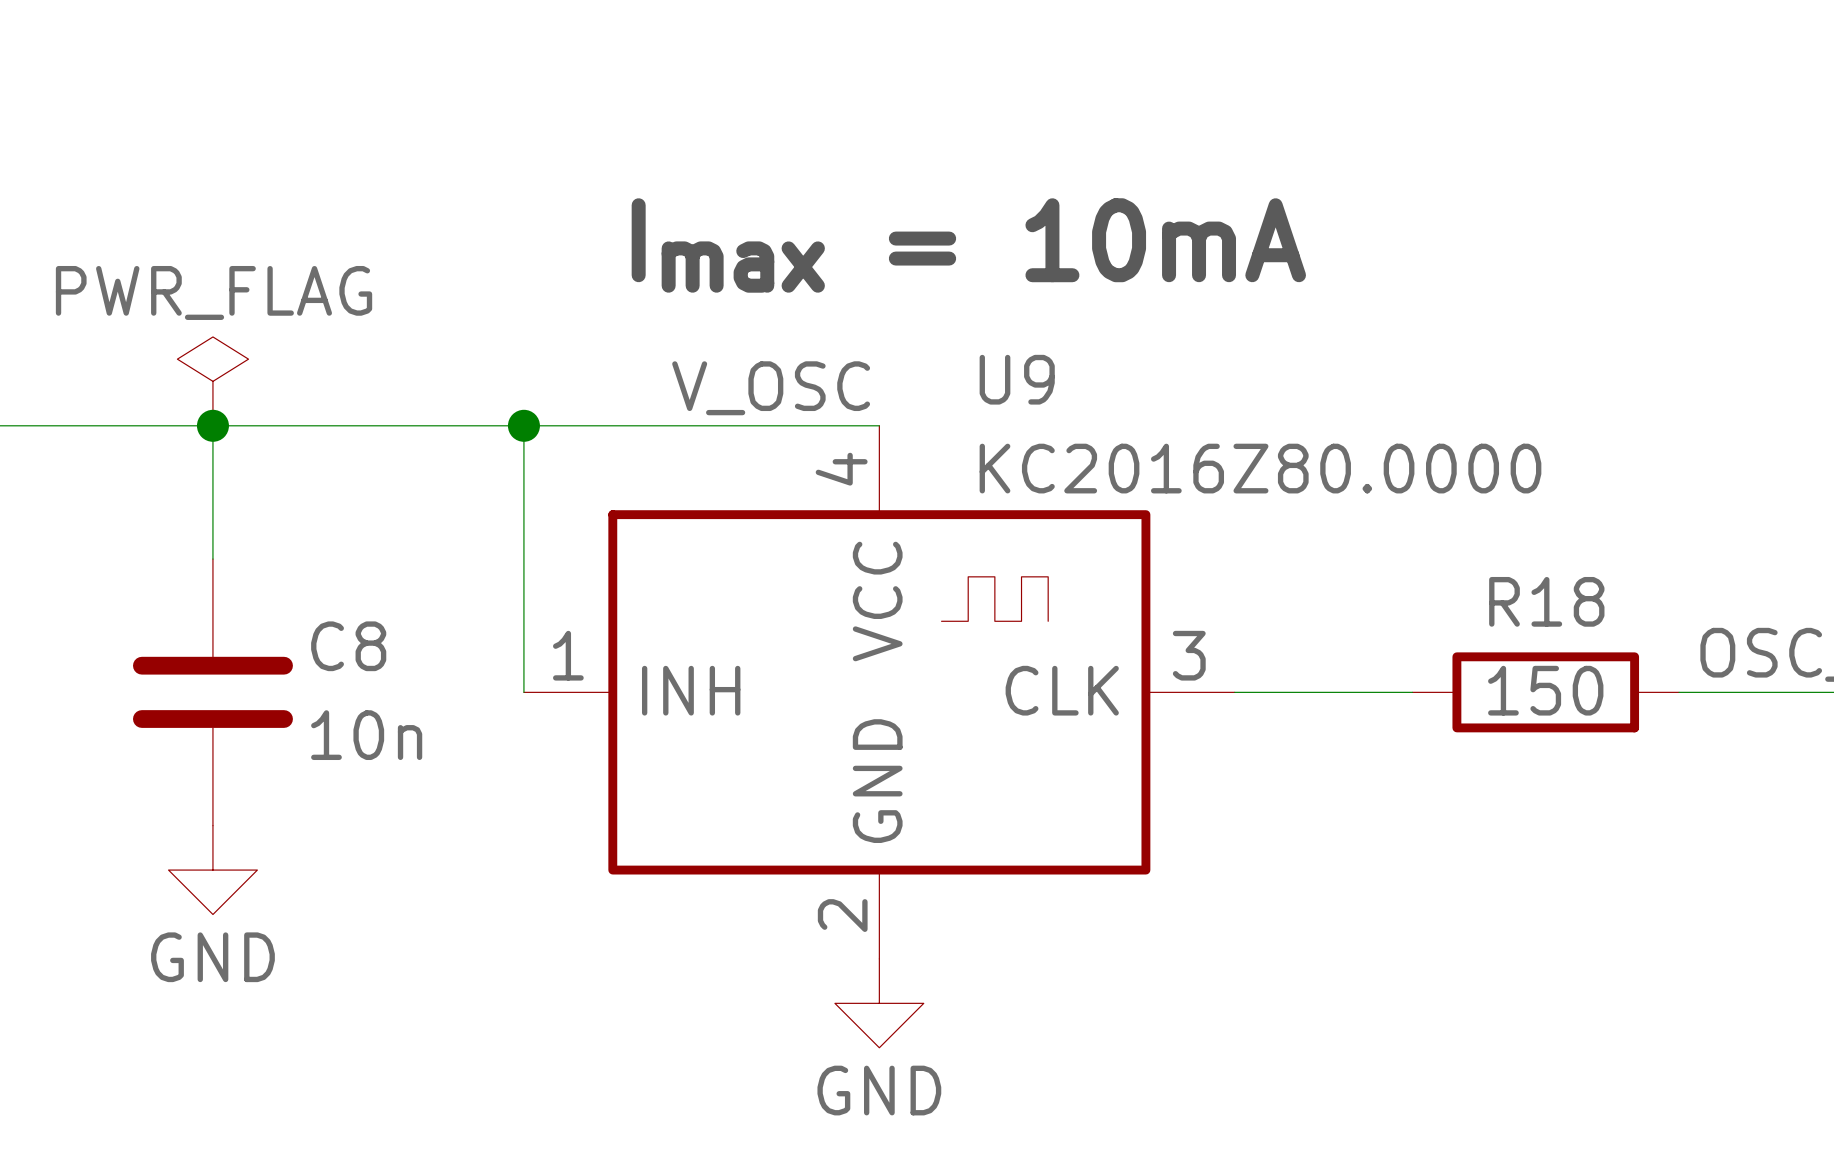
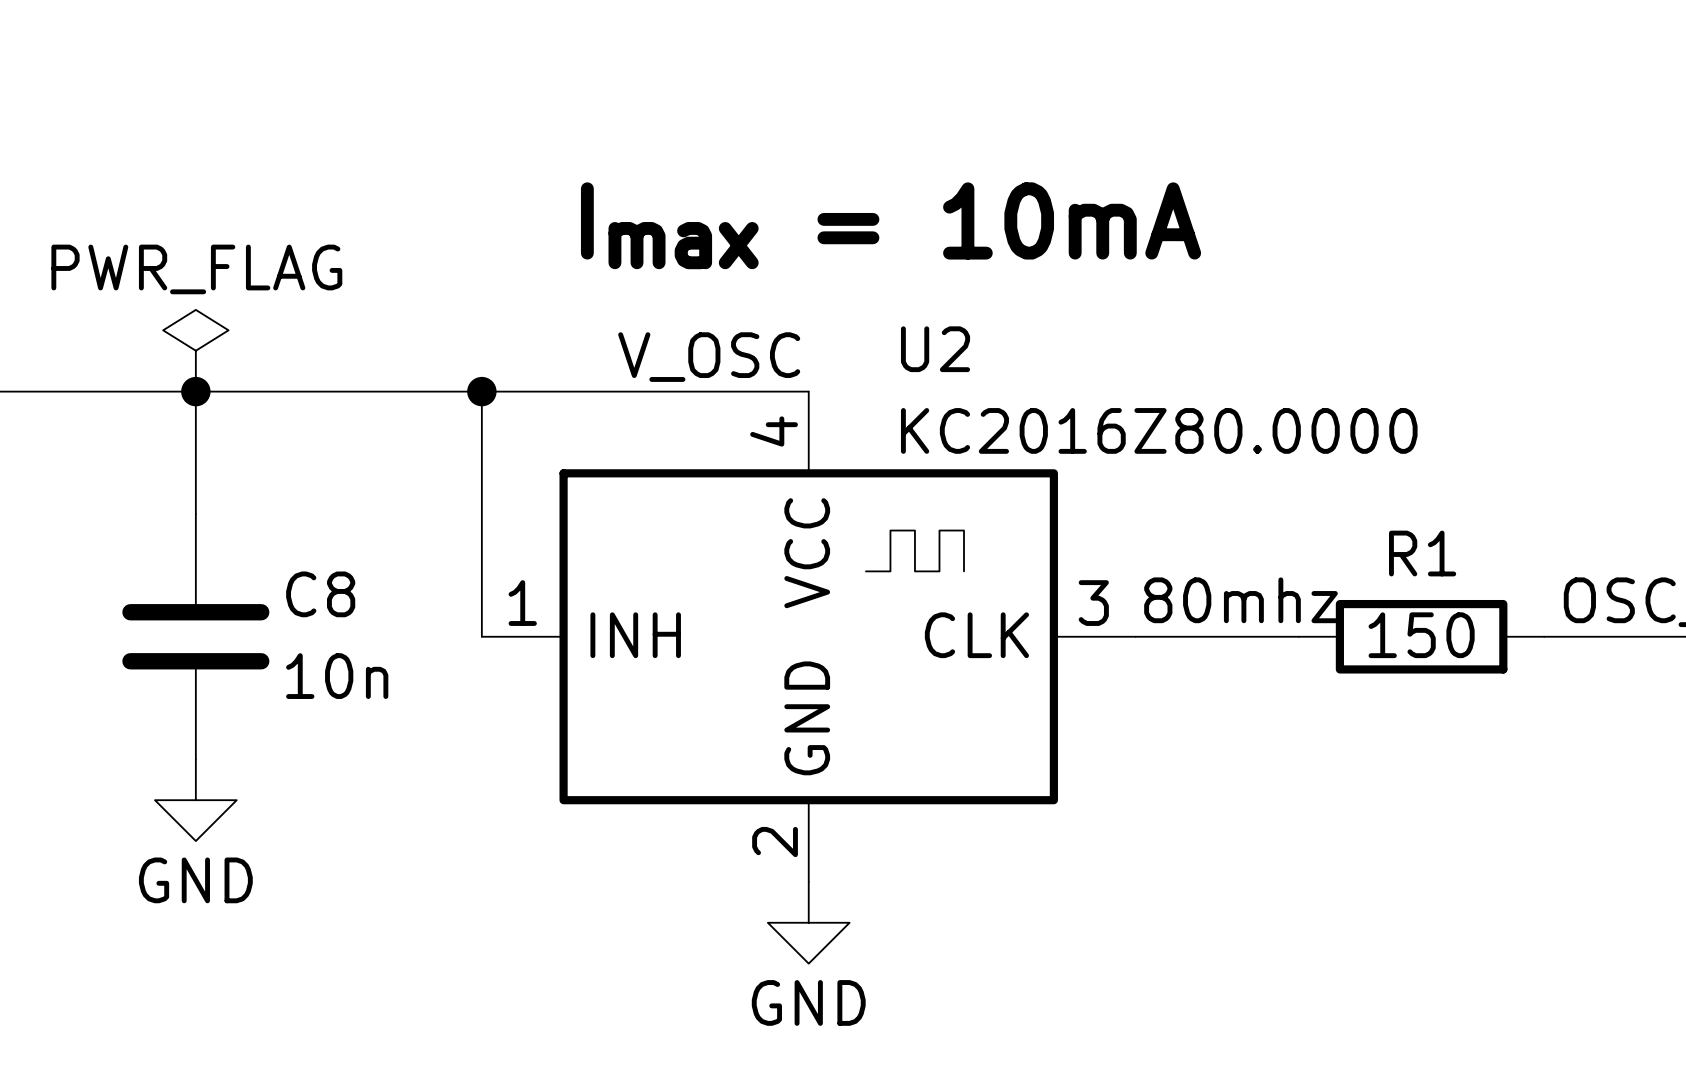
U9 name: U9 (1017, 379) -> U2 (935, 349)
R18 name: R18 (1546, 601) -> R1 (1422, 553)
label: none -> 80mhz (1240, 600)

